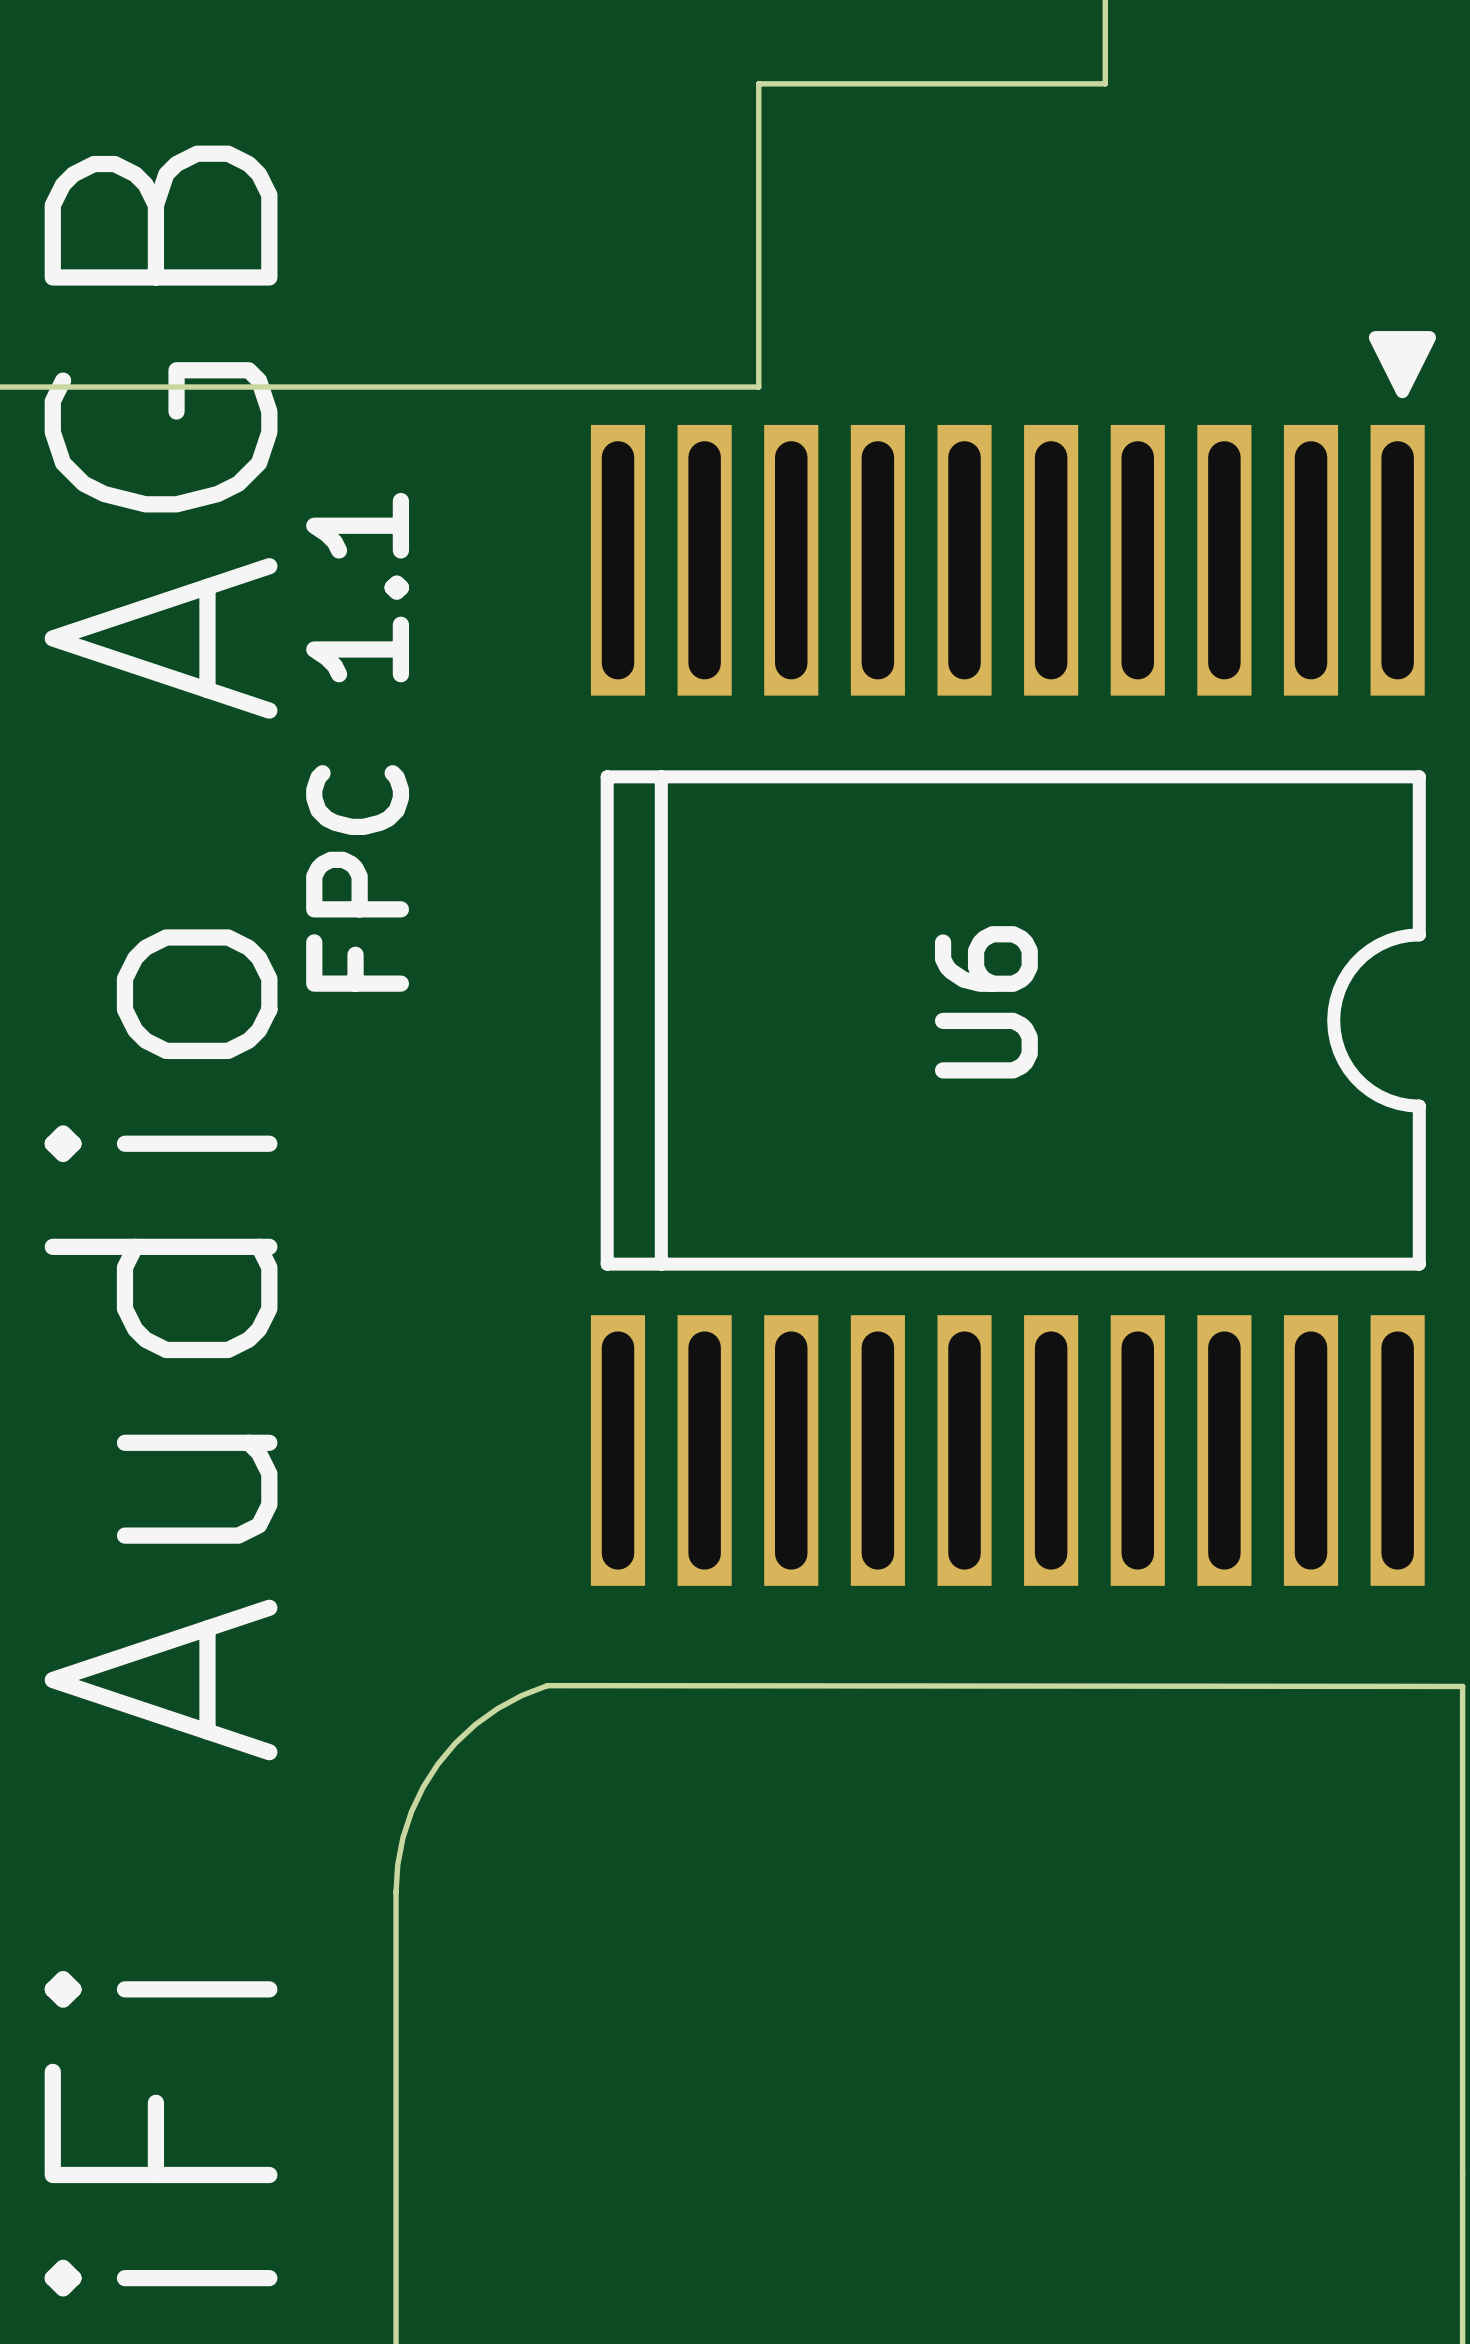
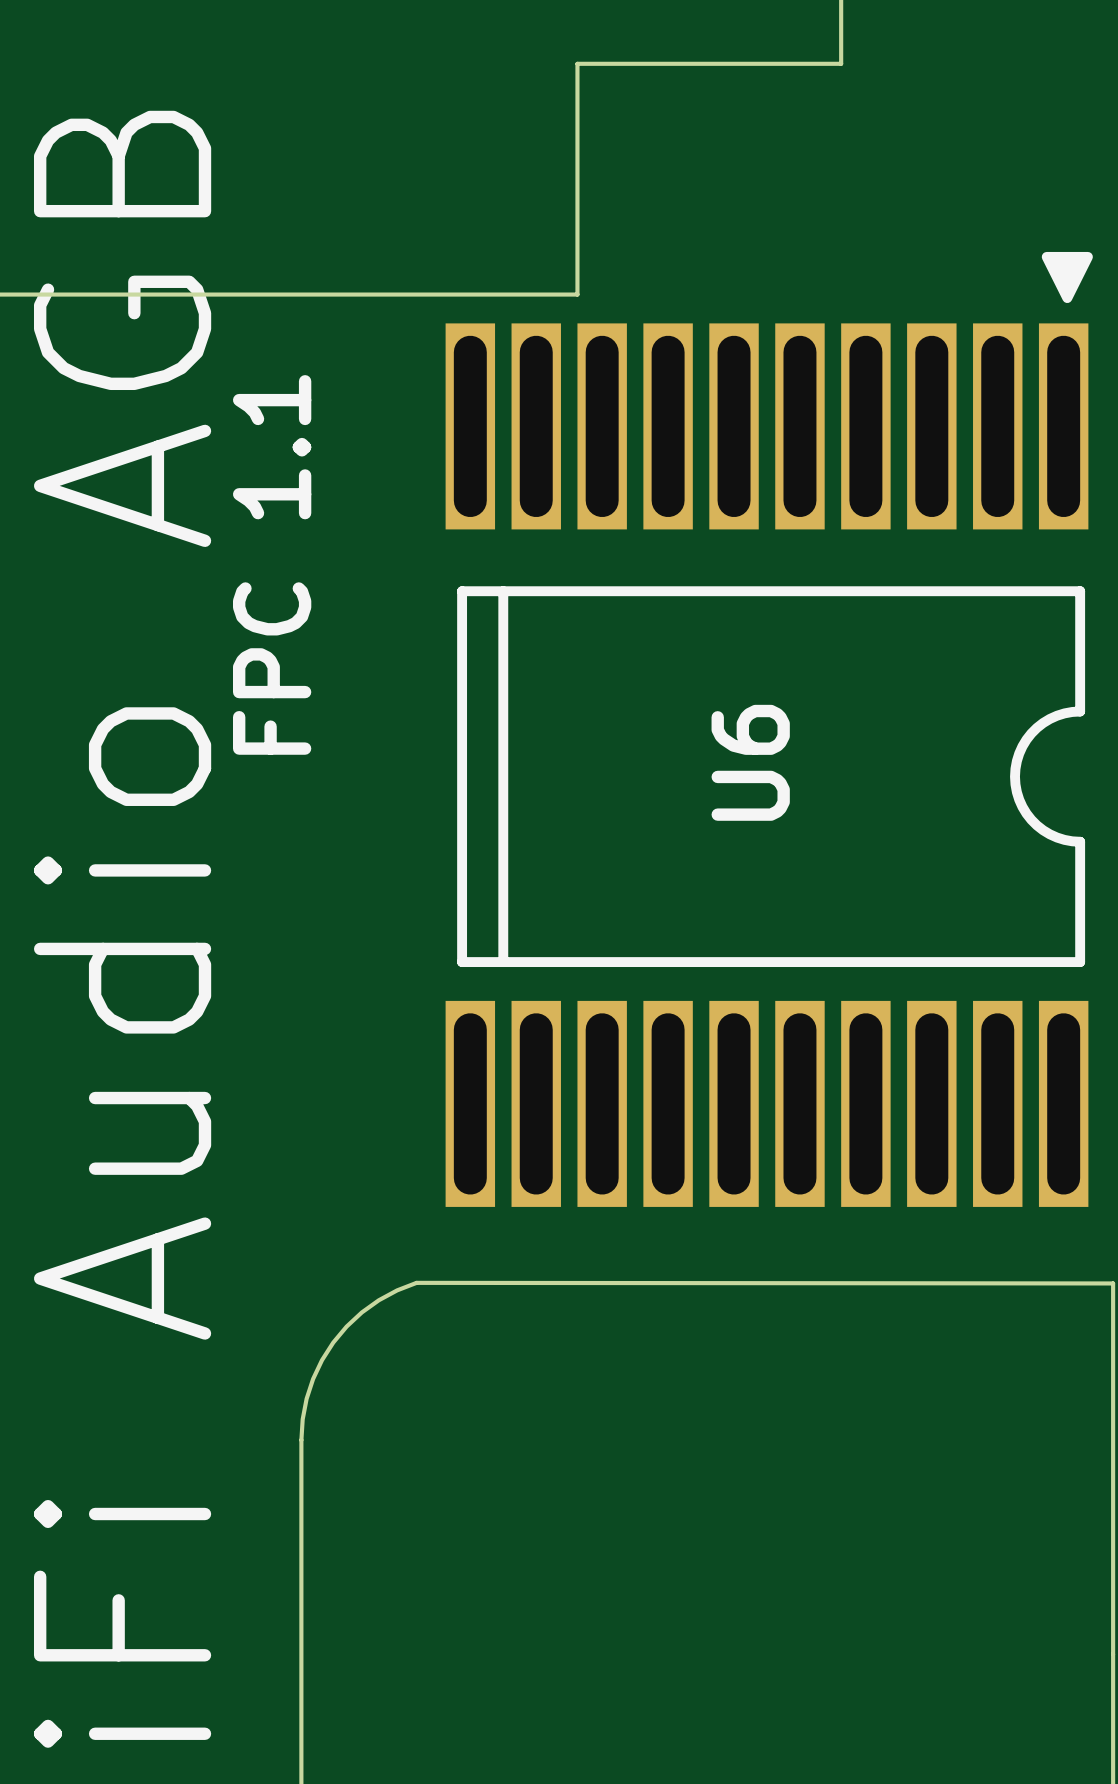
part footprint: [590, 331, 1437, 1586] -> [445, 251, 1093, 1207]

